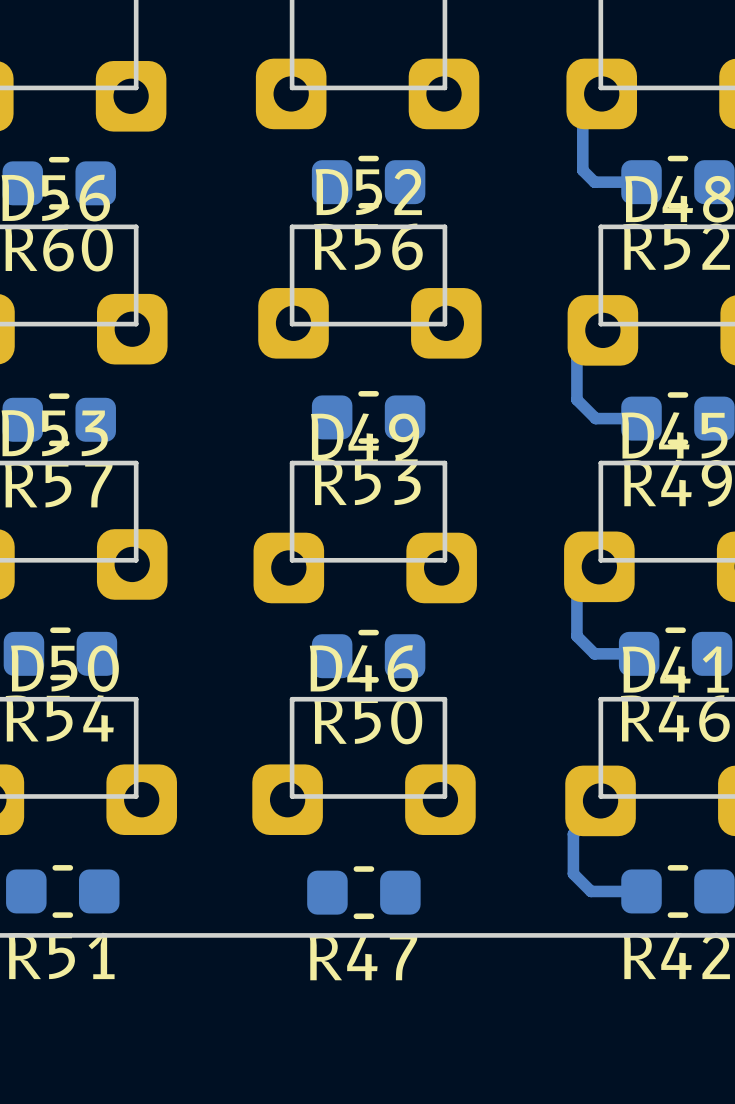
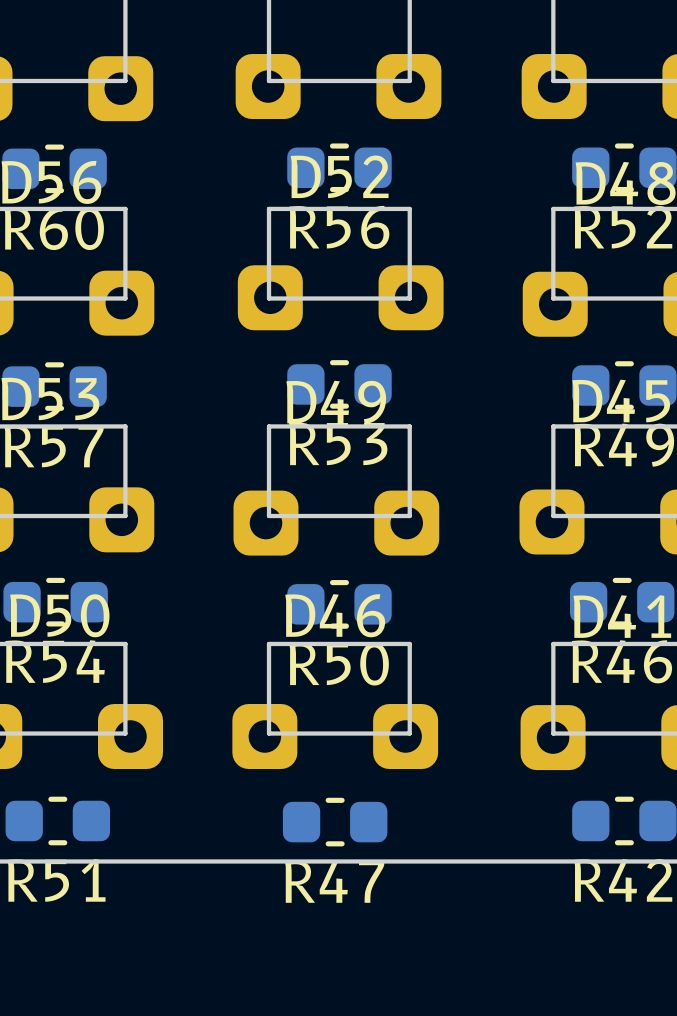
bottom track: (601, 105) (593, 105) (582, 116) (582, 170) (594, 182) (641, 182) -> none
bottom track: (602, 341) (593, 341) (576, 358) (576, 399) (595, 418) (641, 418) -> none
bottom track: (599, 577) (593, 577) (576, 594) (576, 636) (594, 653) (639, 653) -> none
bottom track: (600, 813) (593, 813) (573, 834) (573, 873) (591, 891) (641, 891) -> none

